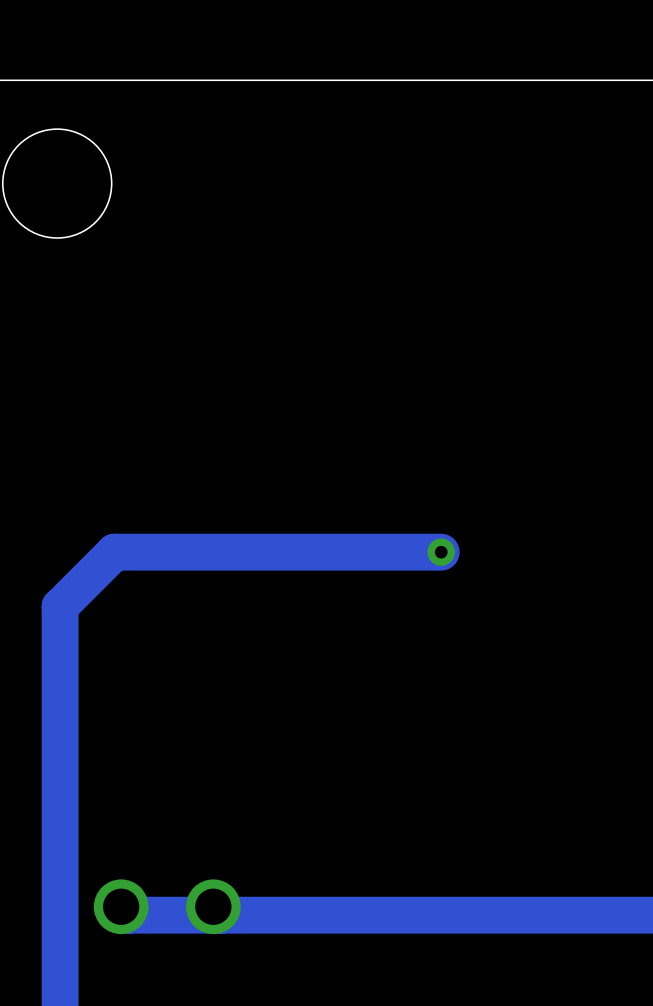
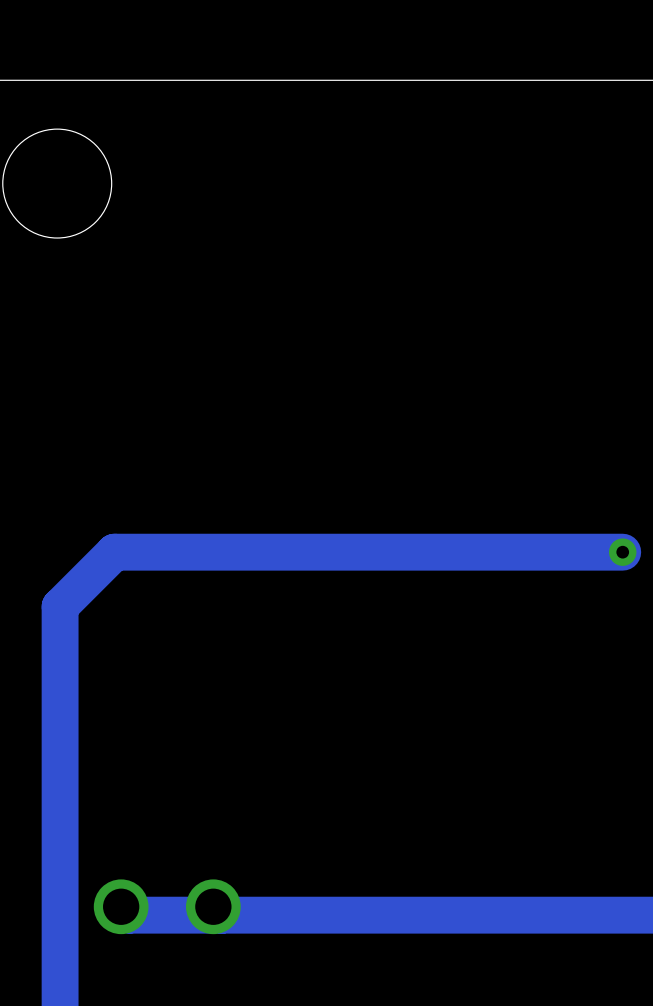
via position: (441, 552) -> (622, 552)
track: none -> (622, 552) (441, 552)

